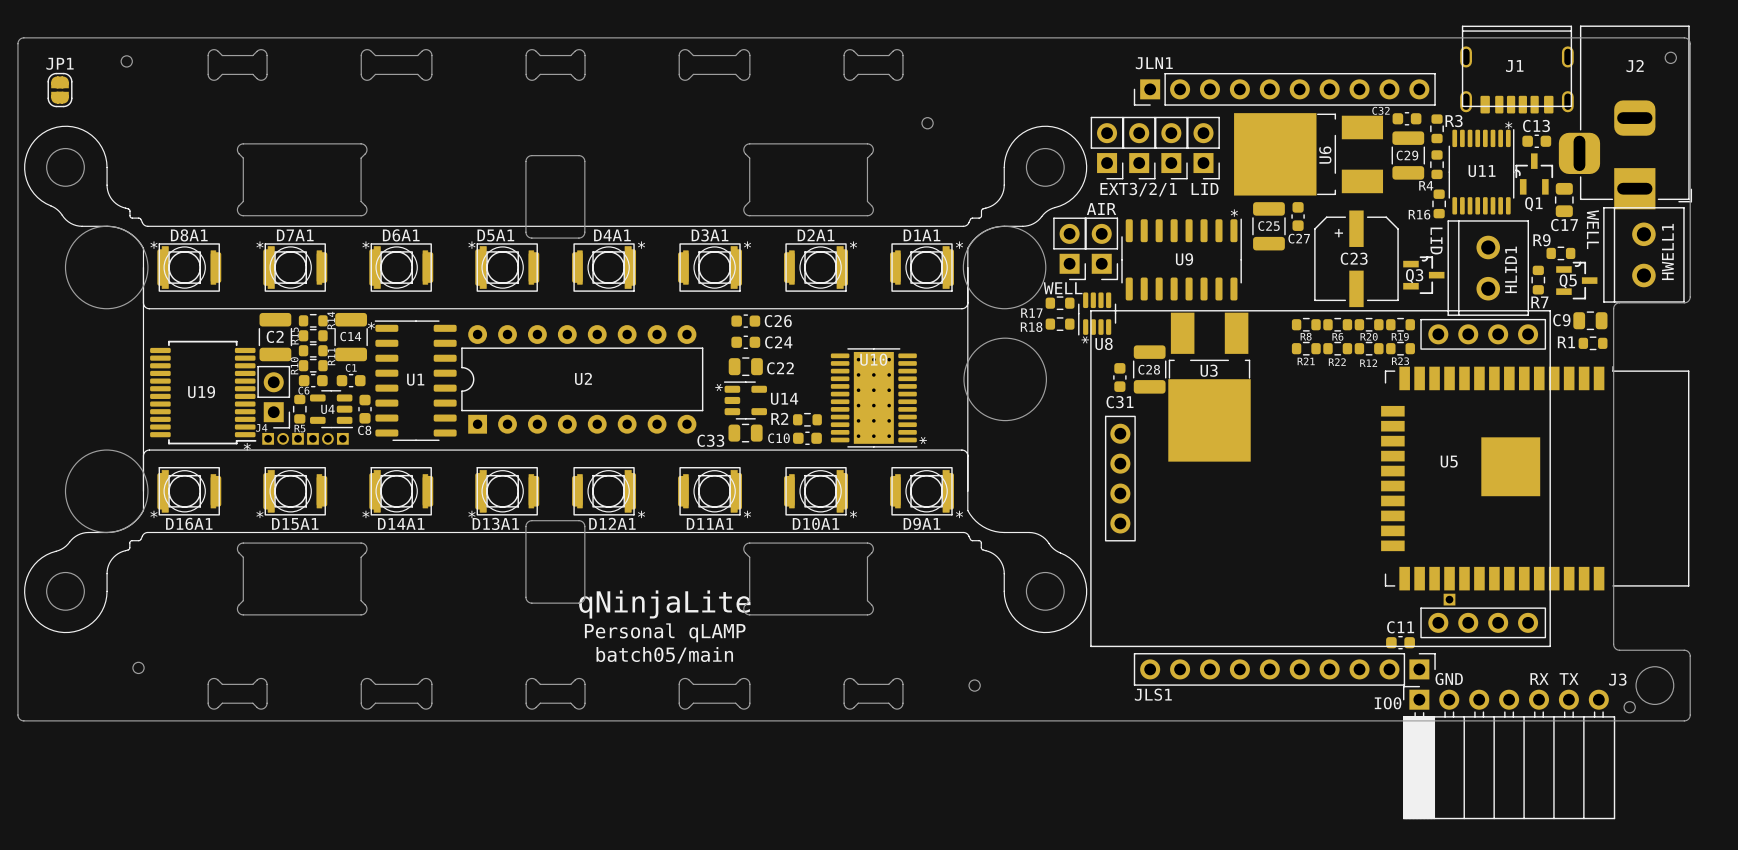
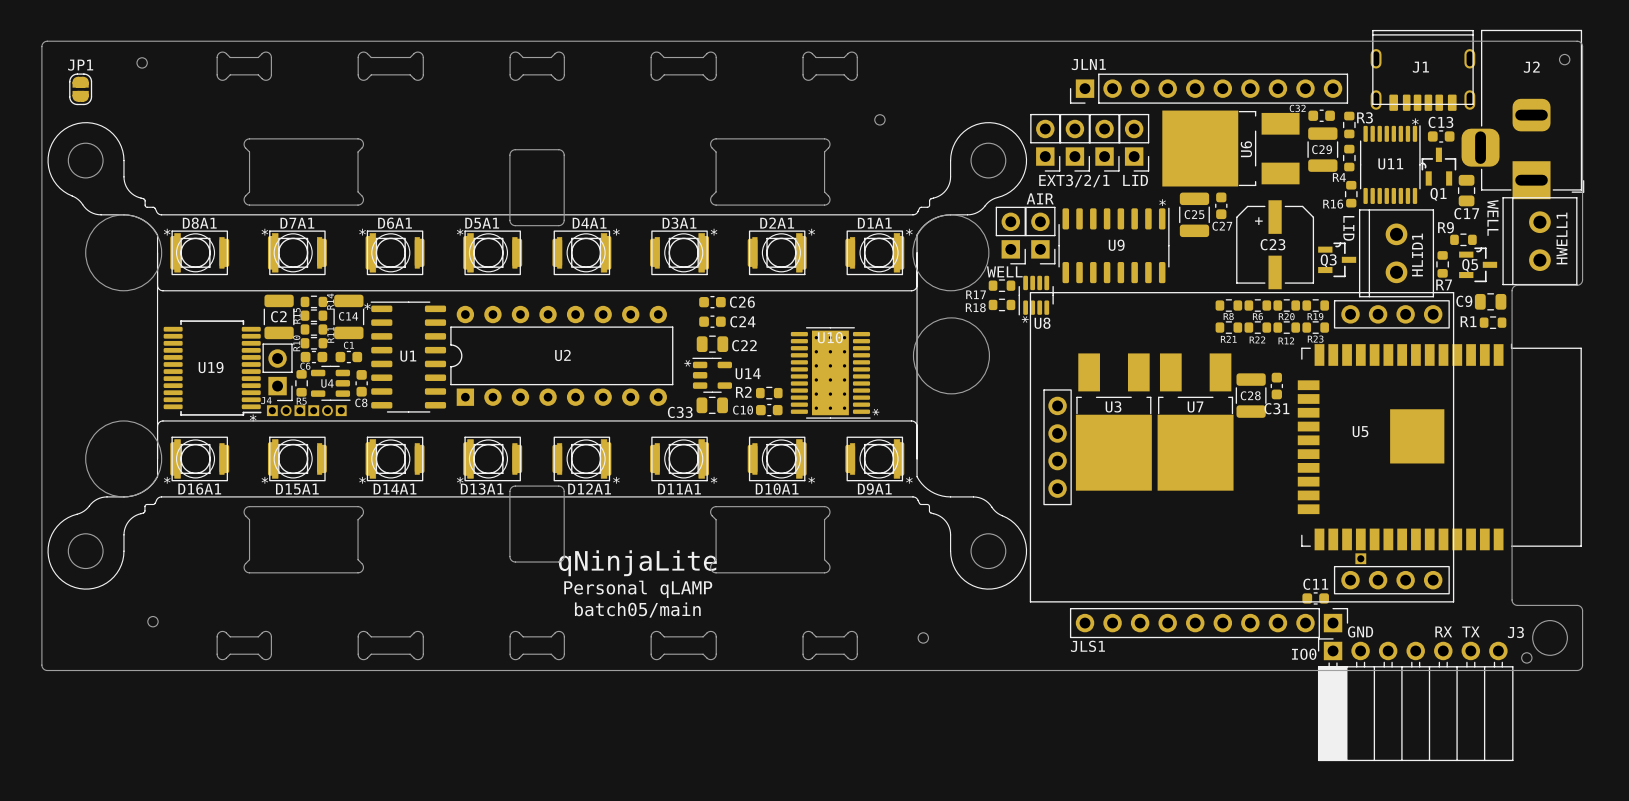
C28 position: (1149, 369) -> (1251, 395)
C31 position: (1119, 377) -> (1276, 386)
U3 position: (1209, 387) -> (1113, 422)
U7: none -> (1195, 422)

